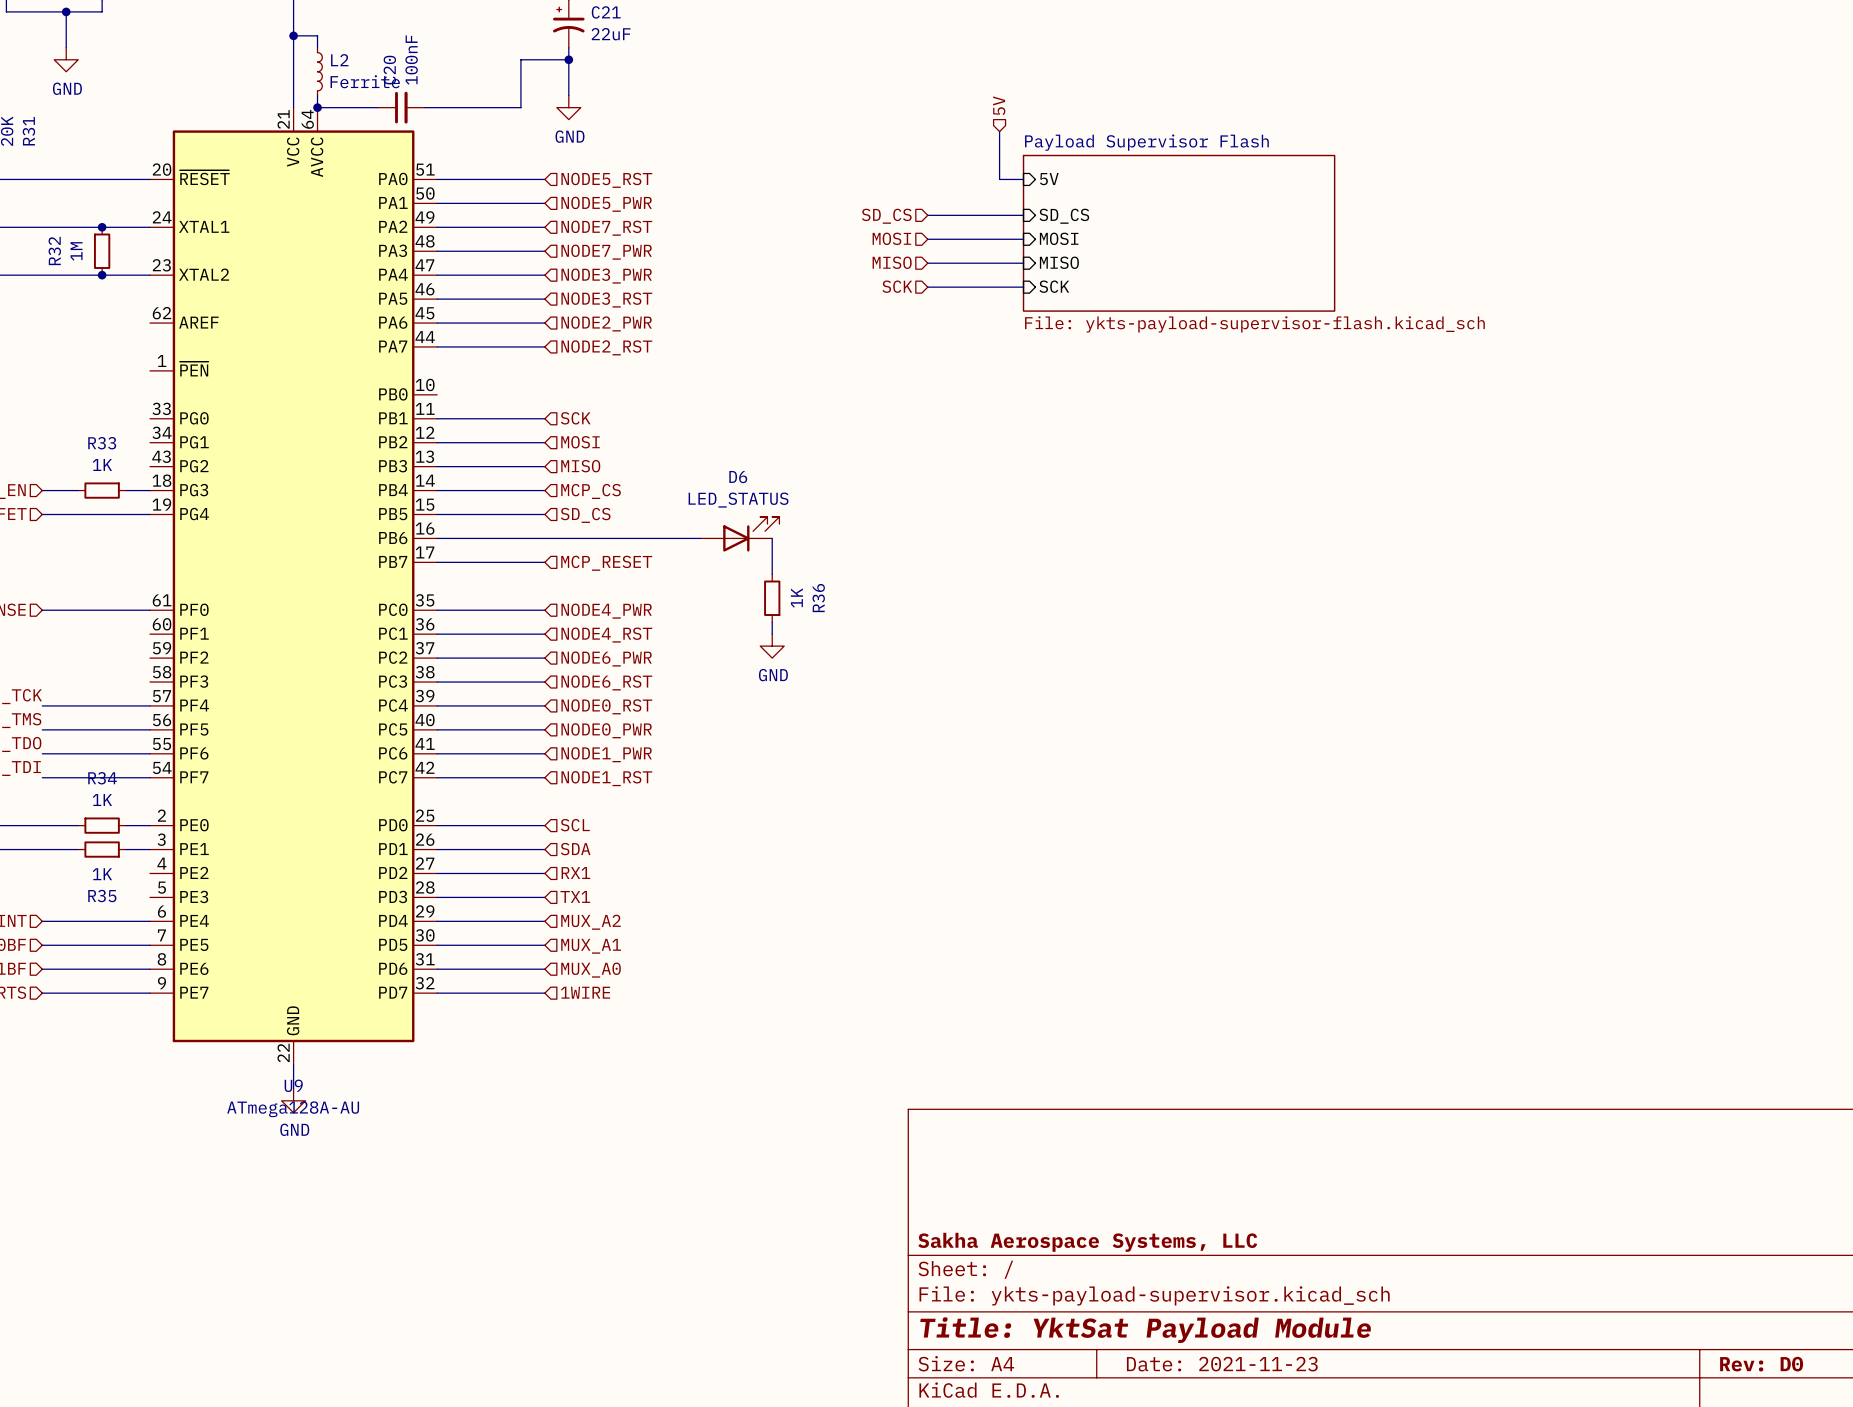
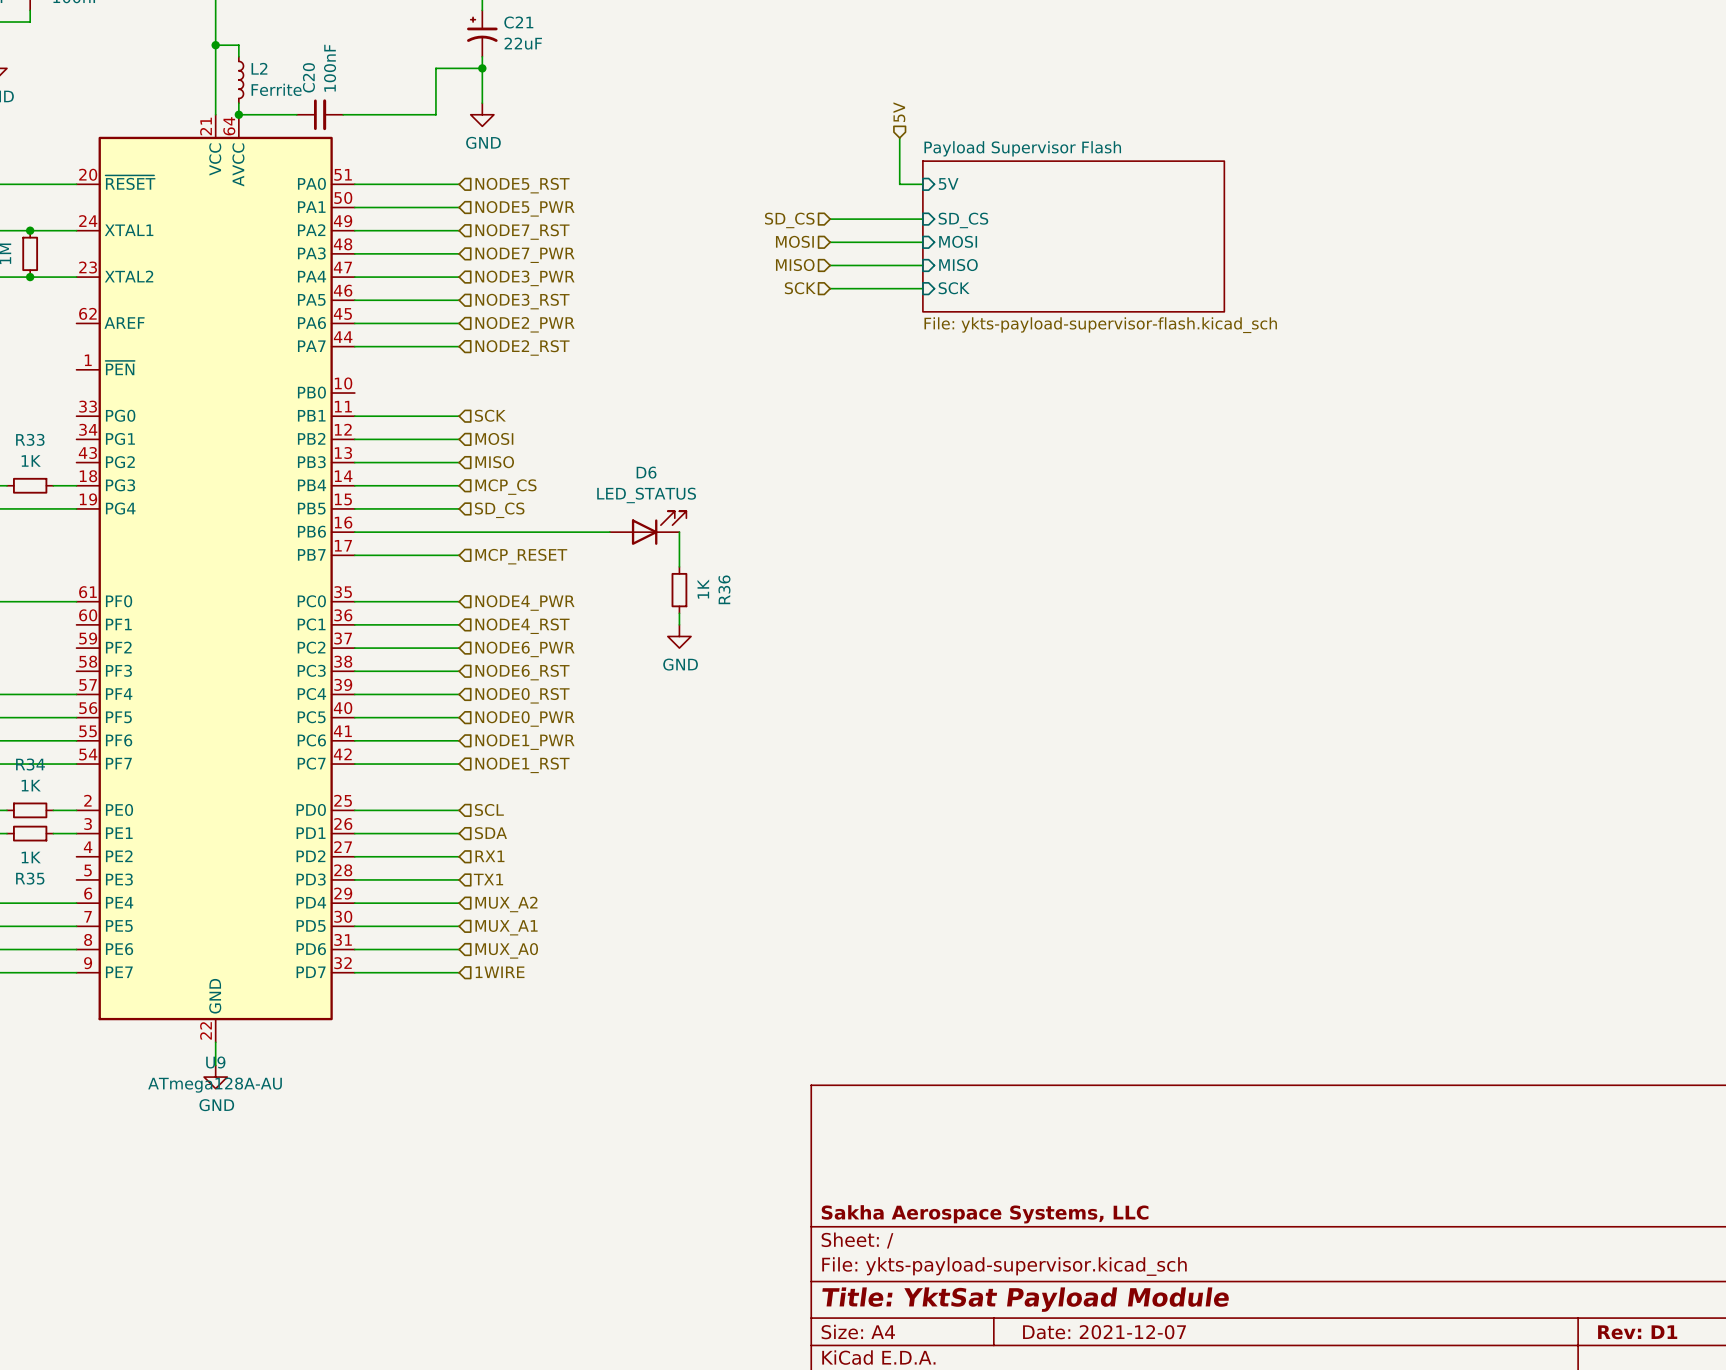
title block: Date: 2021-11-23 (1222, 1364) -> Date: 2021-12-07 (1104, 1332)
title block: Rev: D0 (1761, 1364) -> Rev: D1 (1637, 1332)

